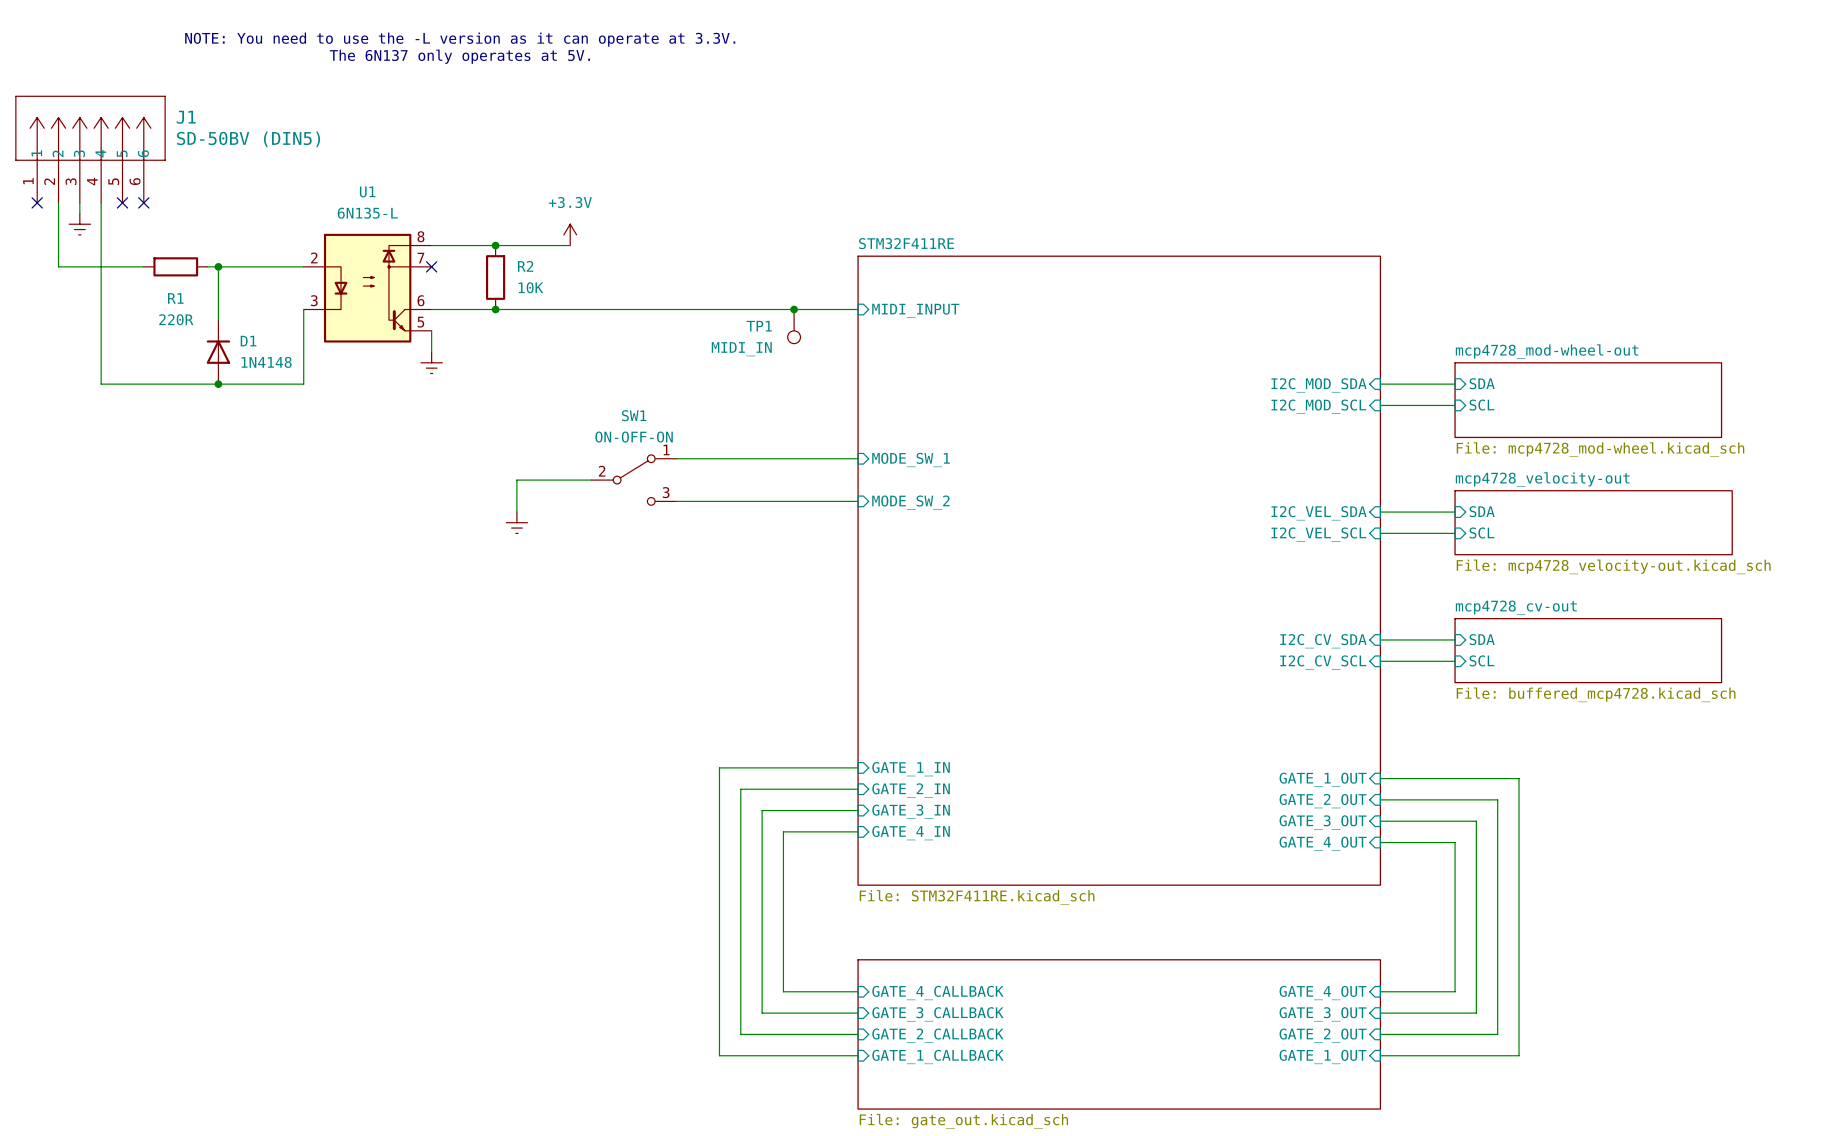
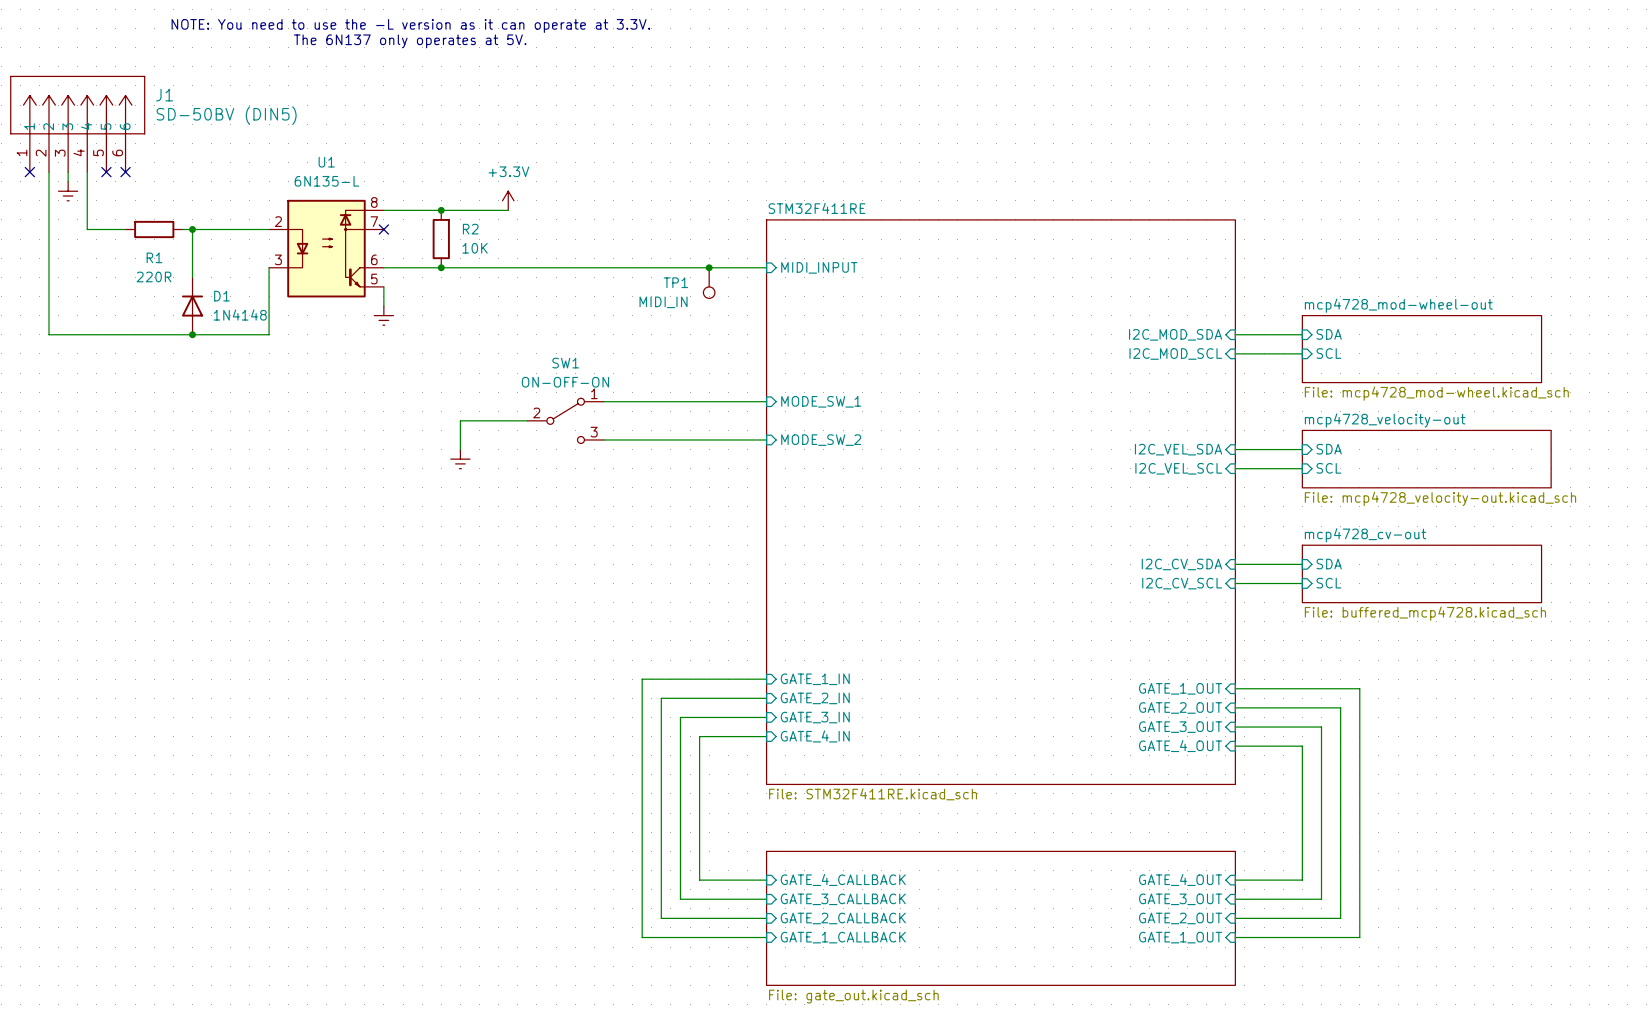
wire: (58, 266) (101, 266) (101, 384) -> (49, 229) (49, 334) (87, 334)

